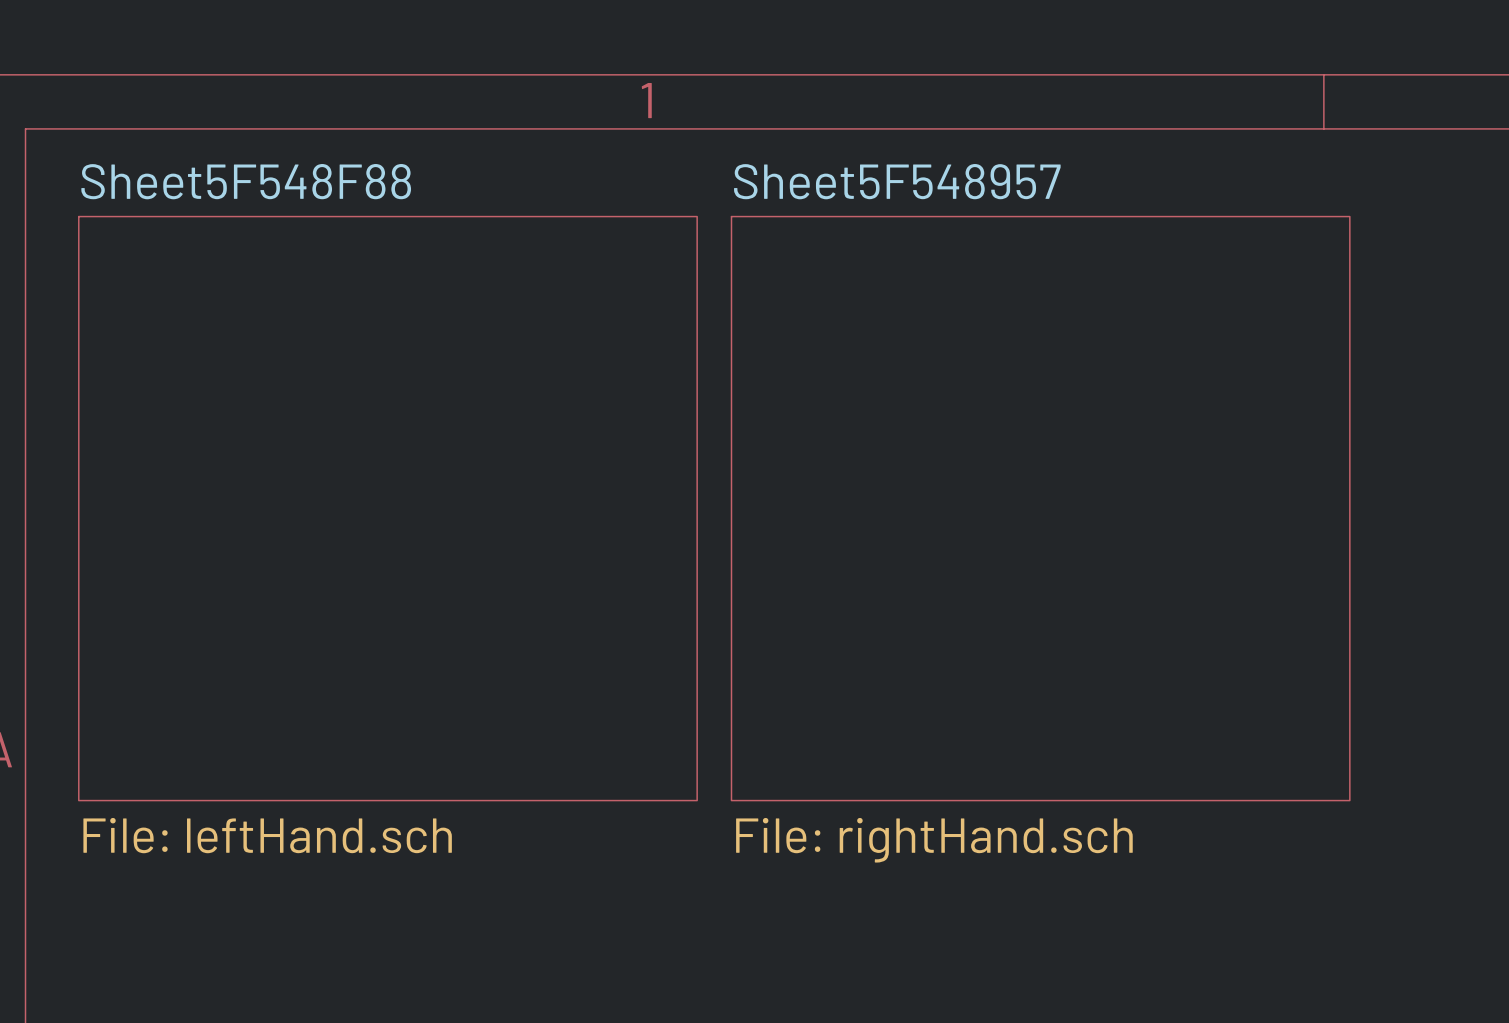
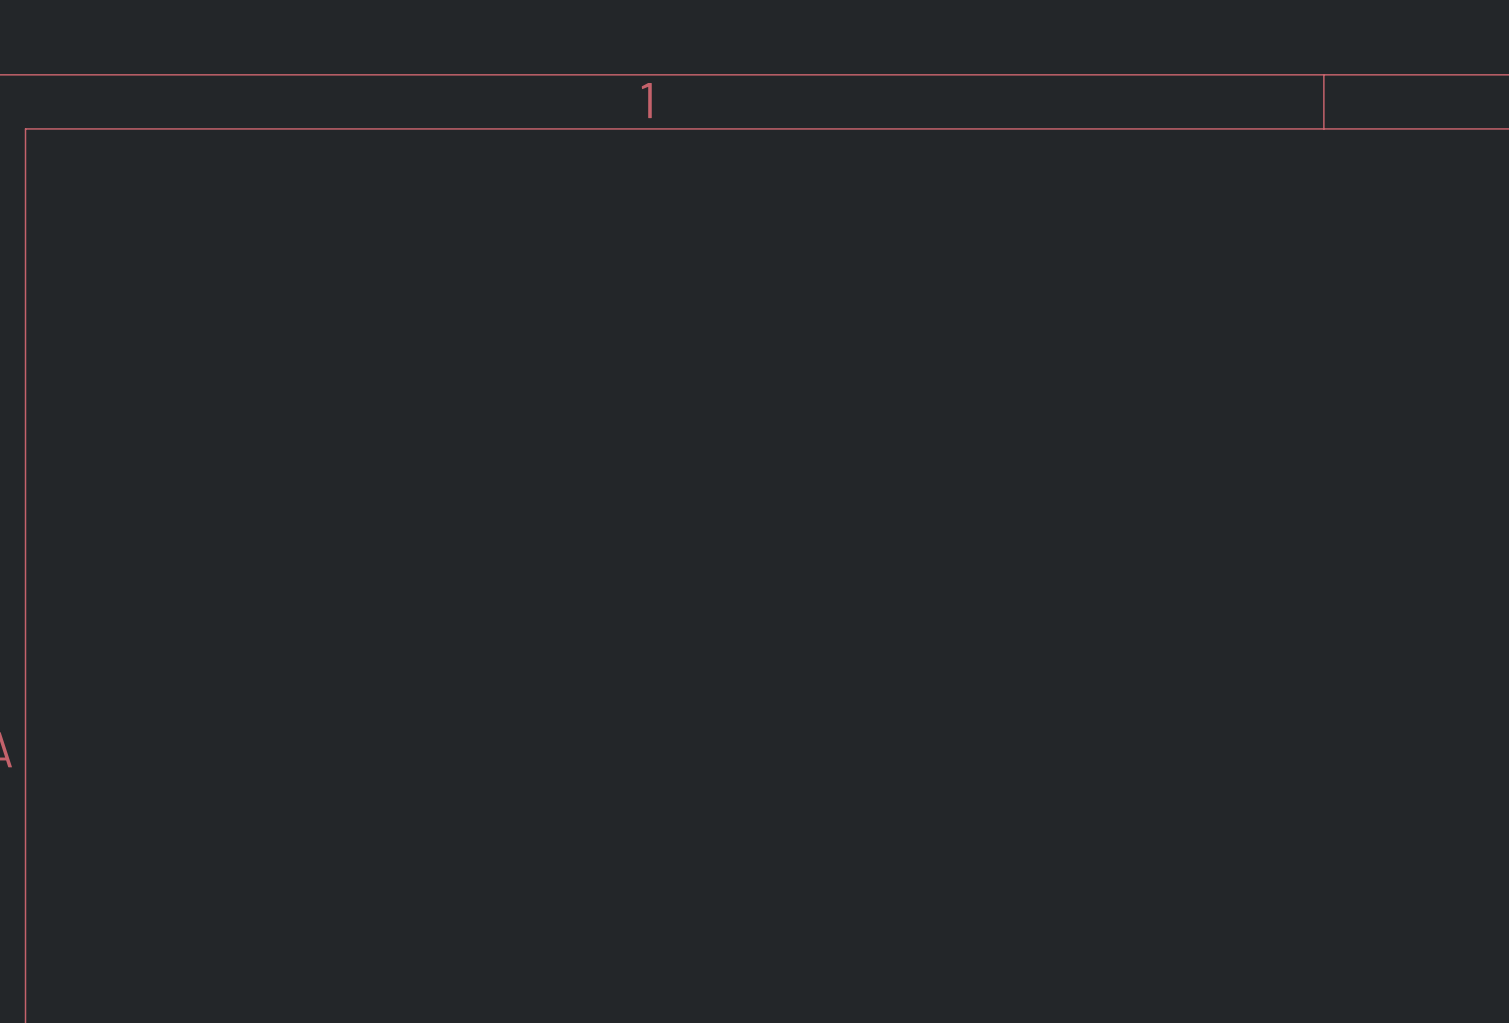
sheet Sheet5F548F88: File: leftHand.sch (387, 508) -> none
sheet Sheet5F548957: File: rightHand.sch (1040, 508) -> none

